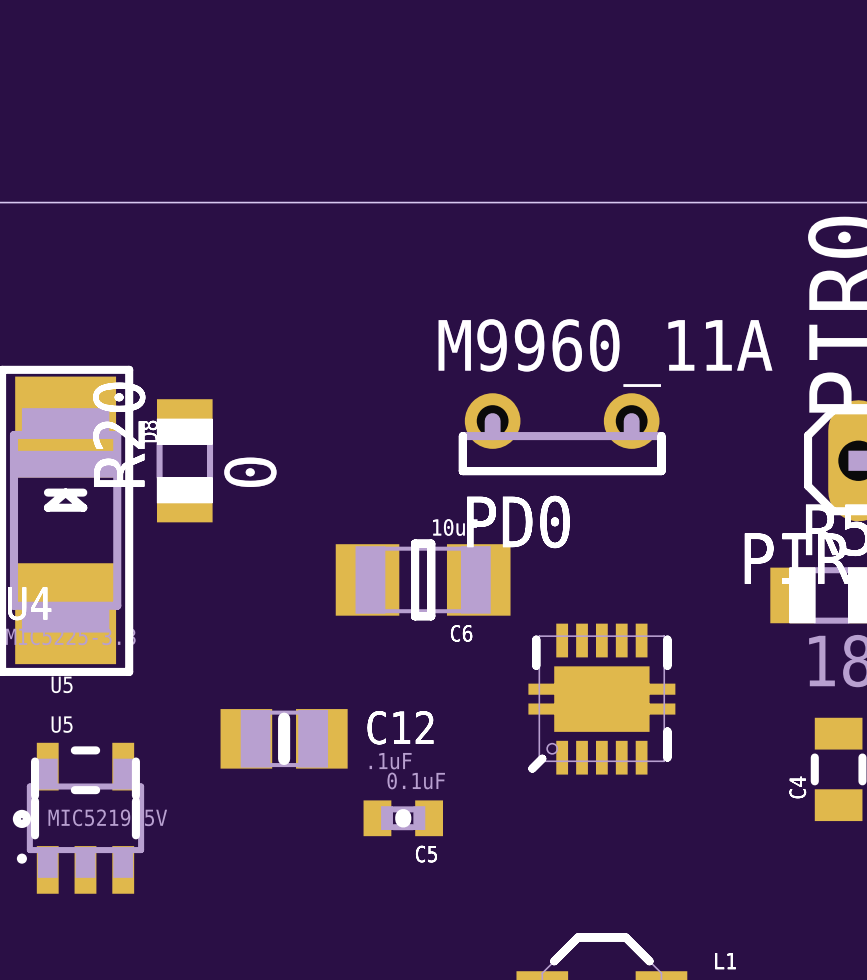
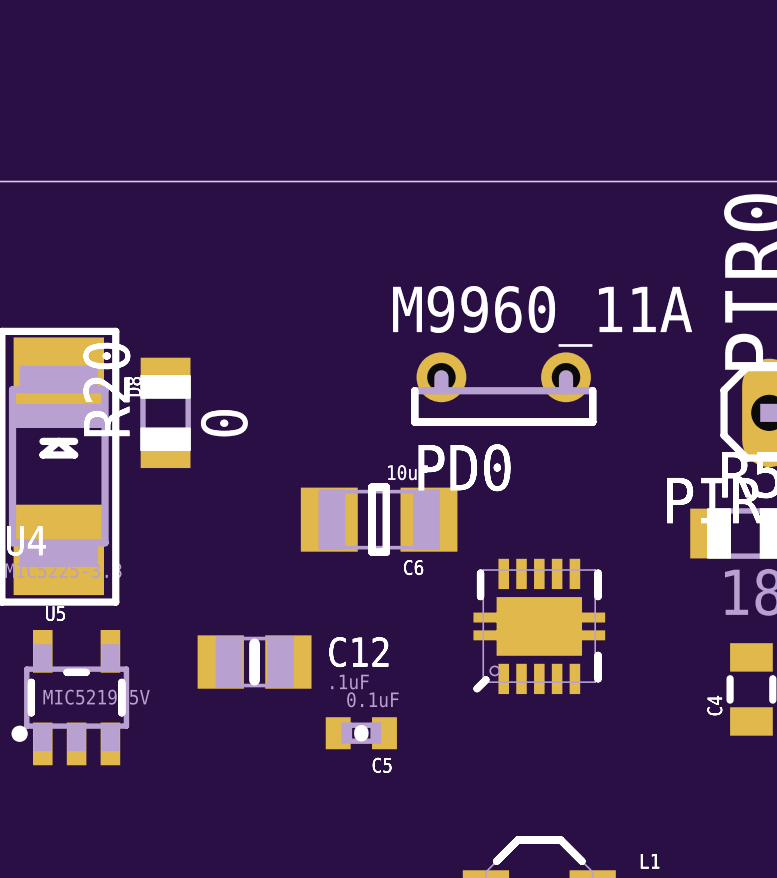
U5 position: (80, 818) -> (72, 697)

